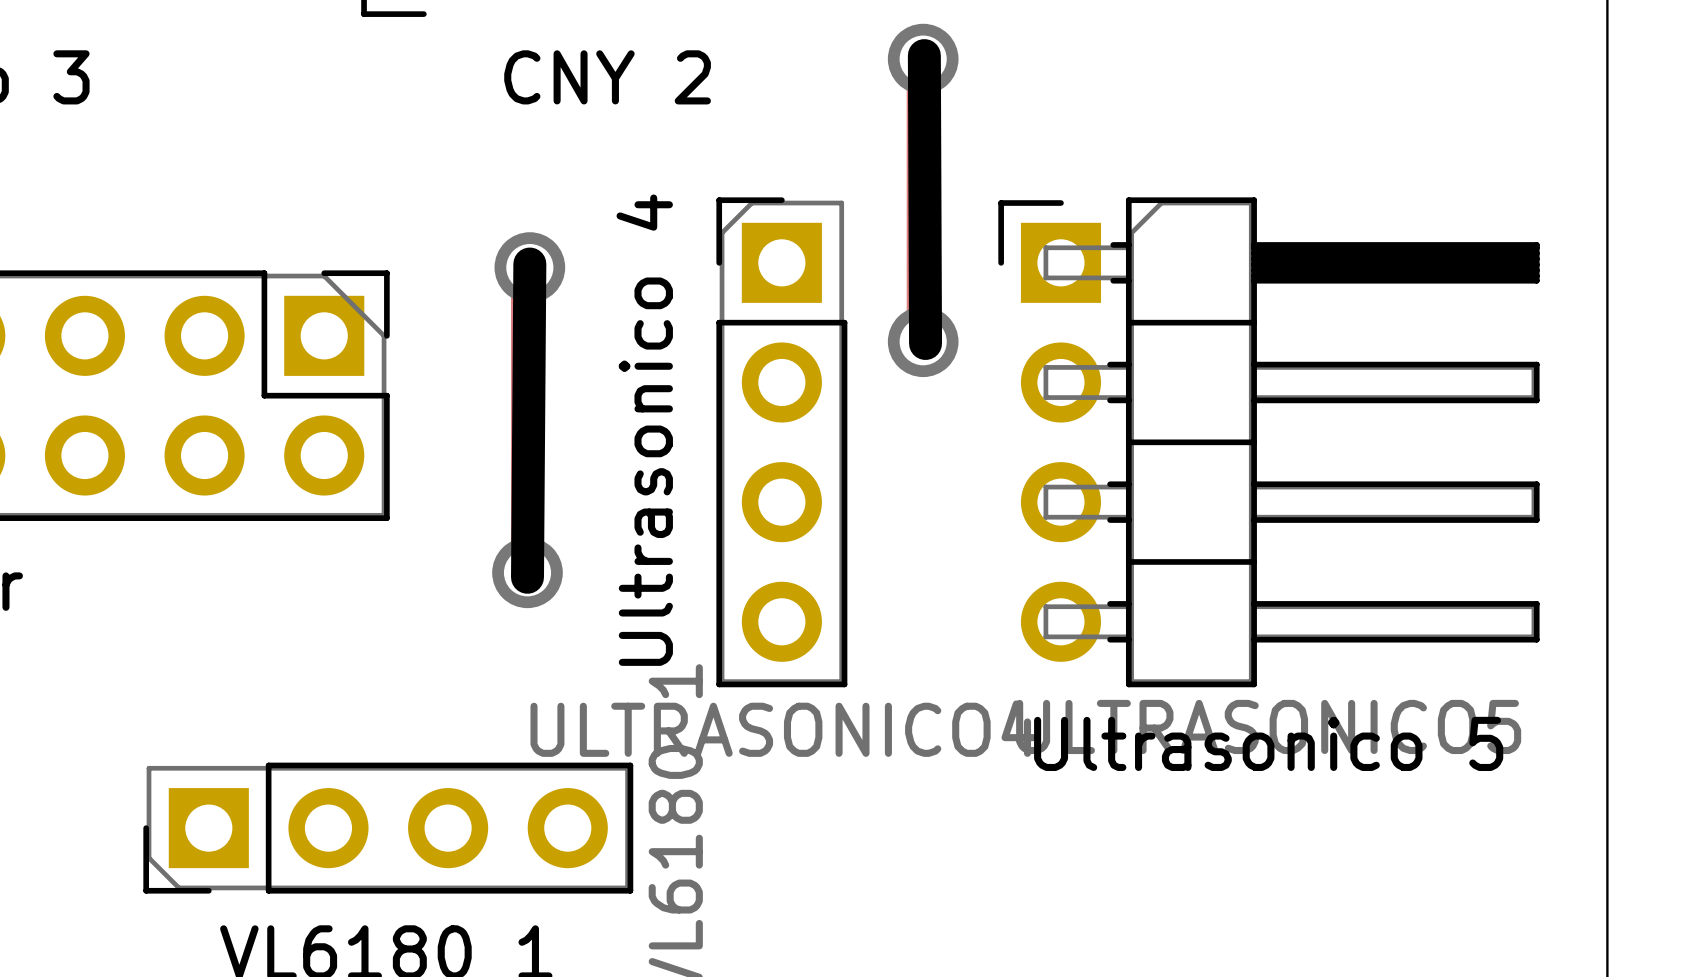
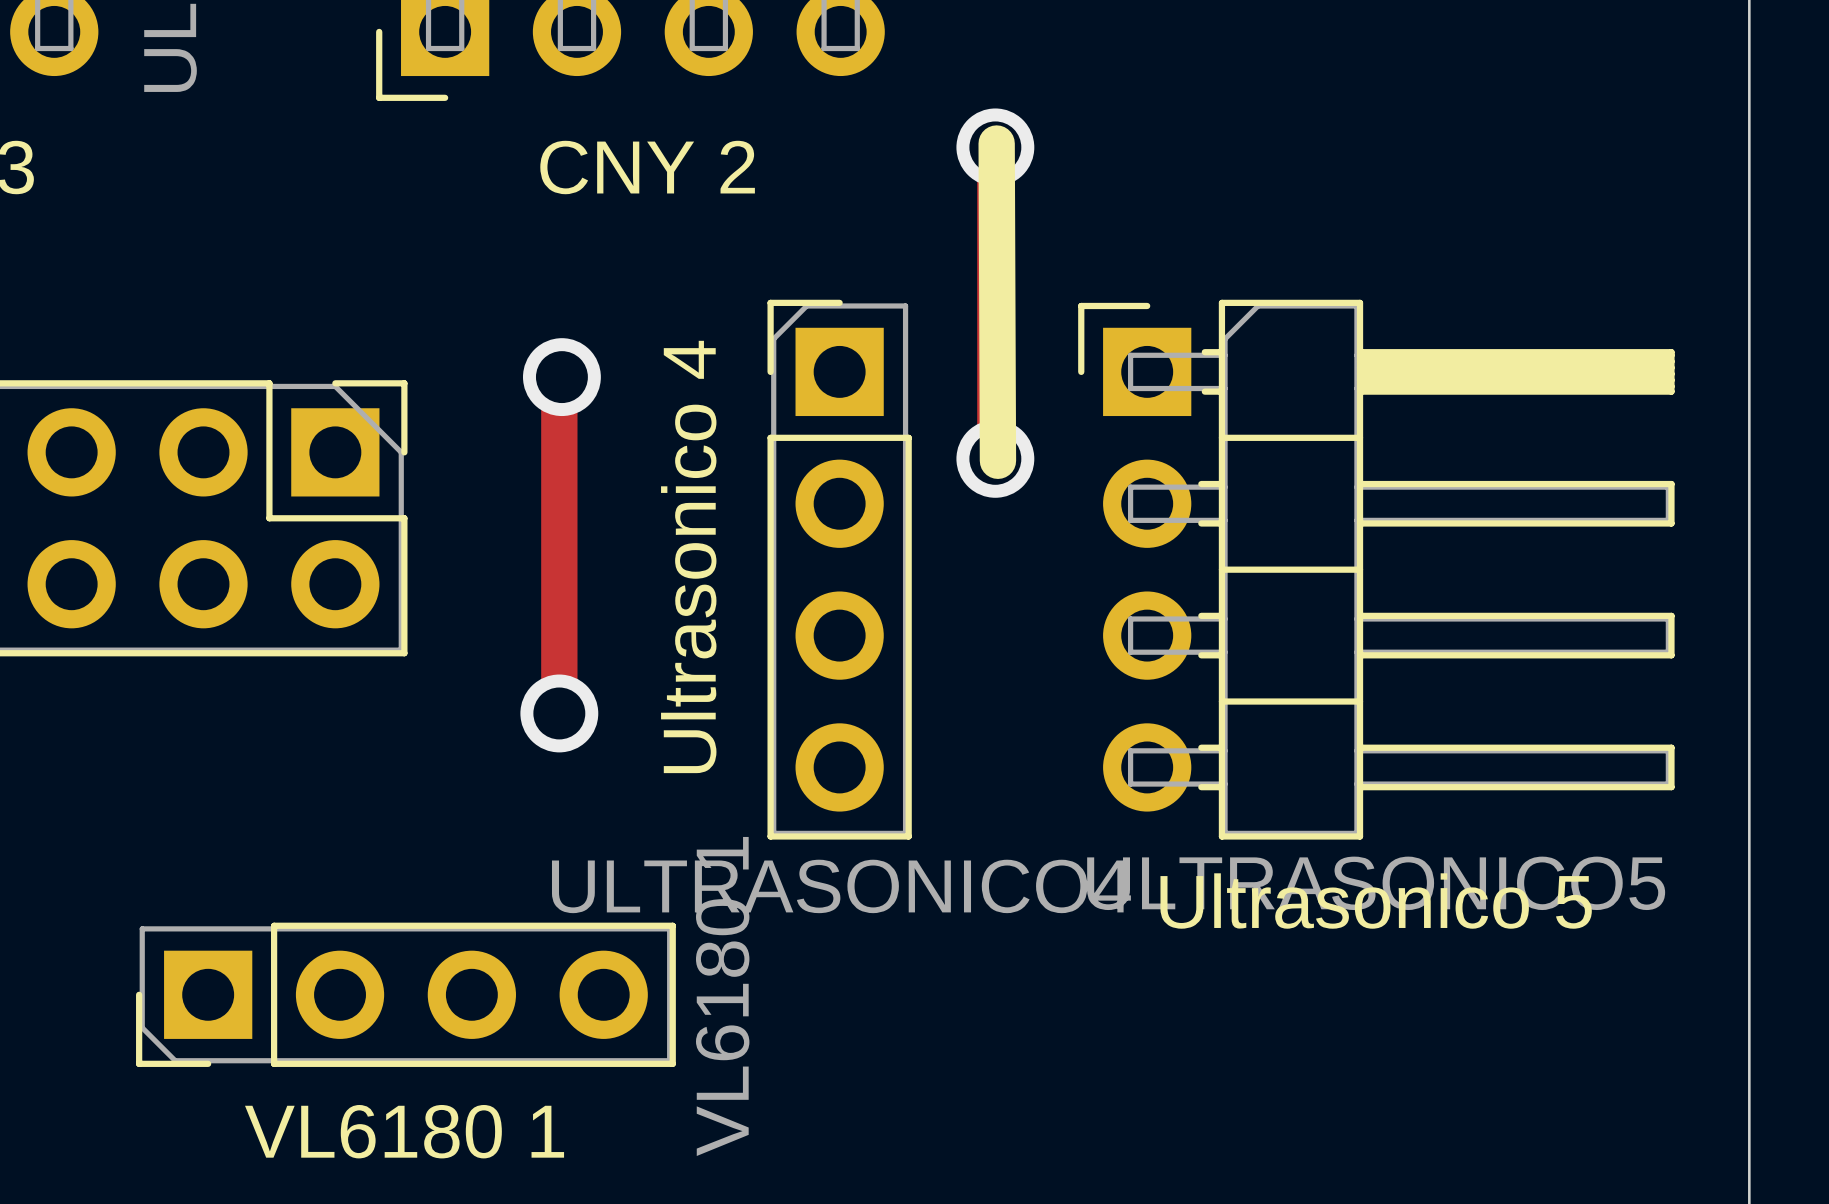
line: (529, 264) (527, 577) -> none

